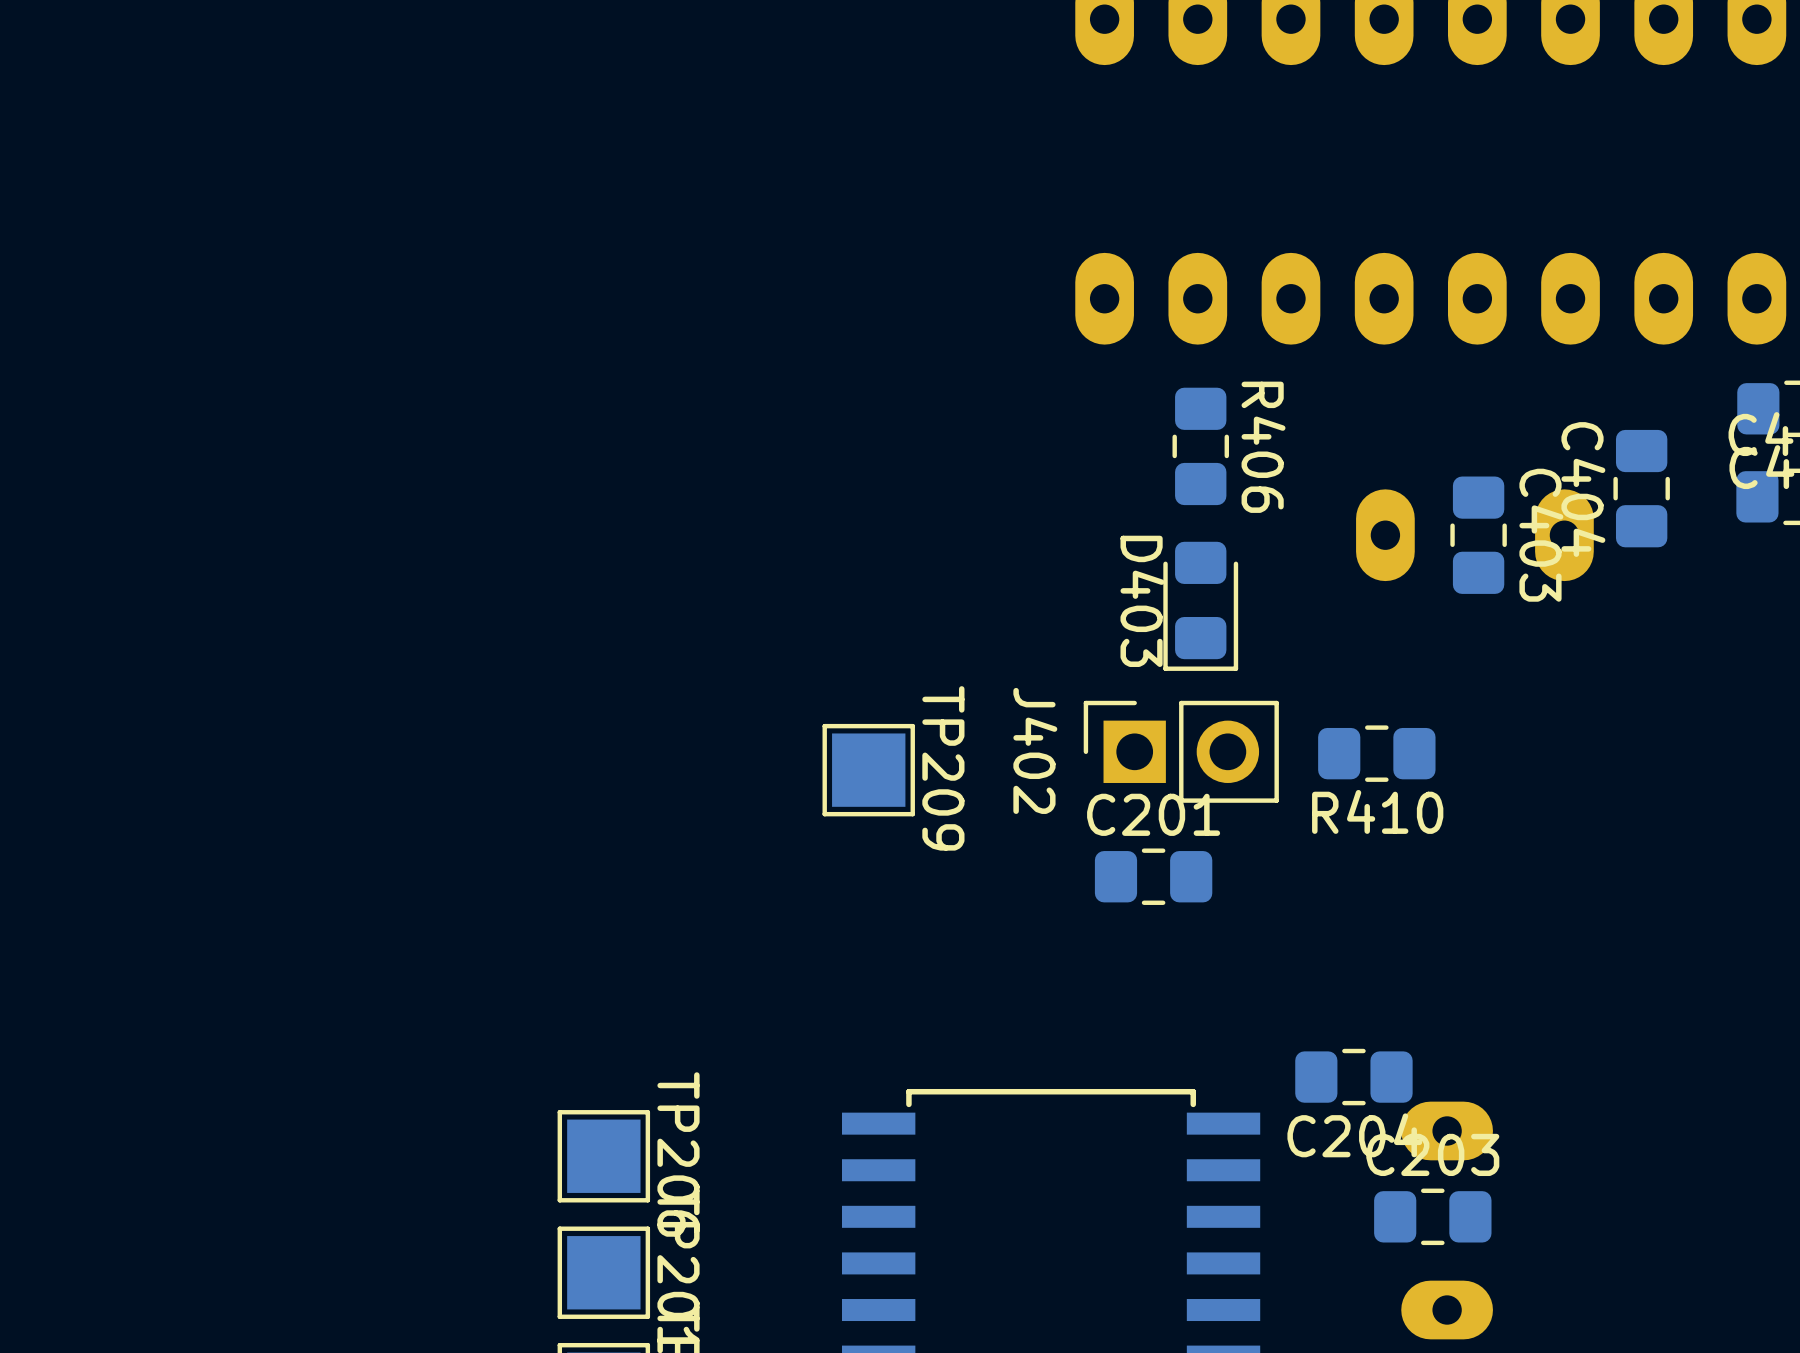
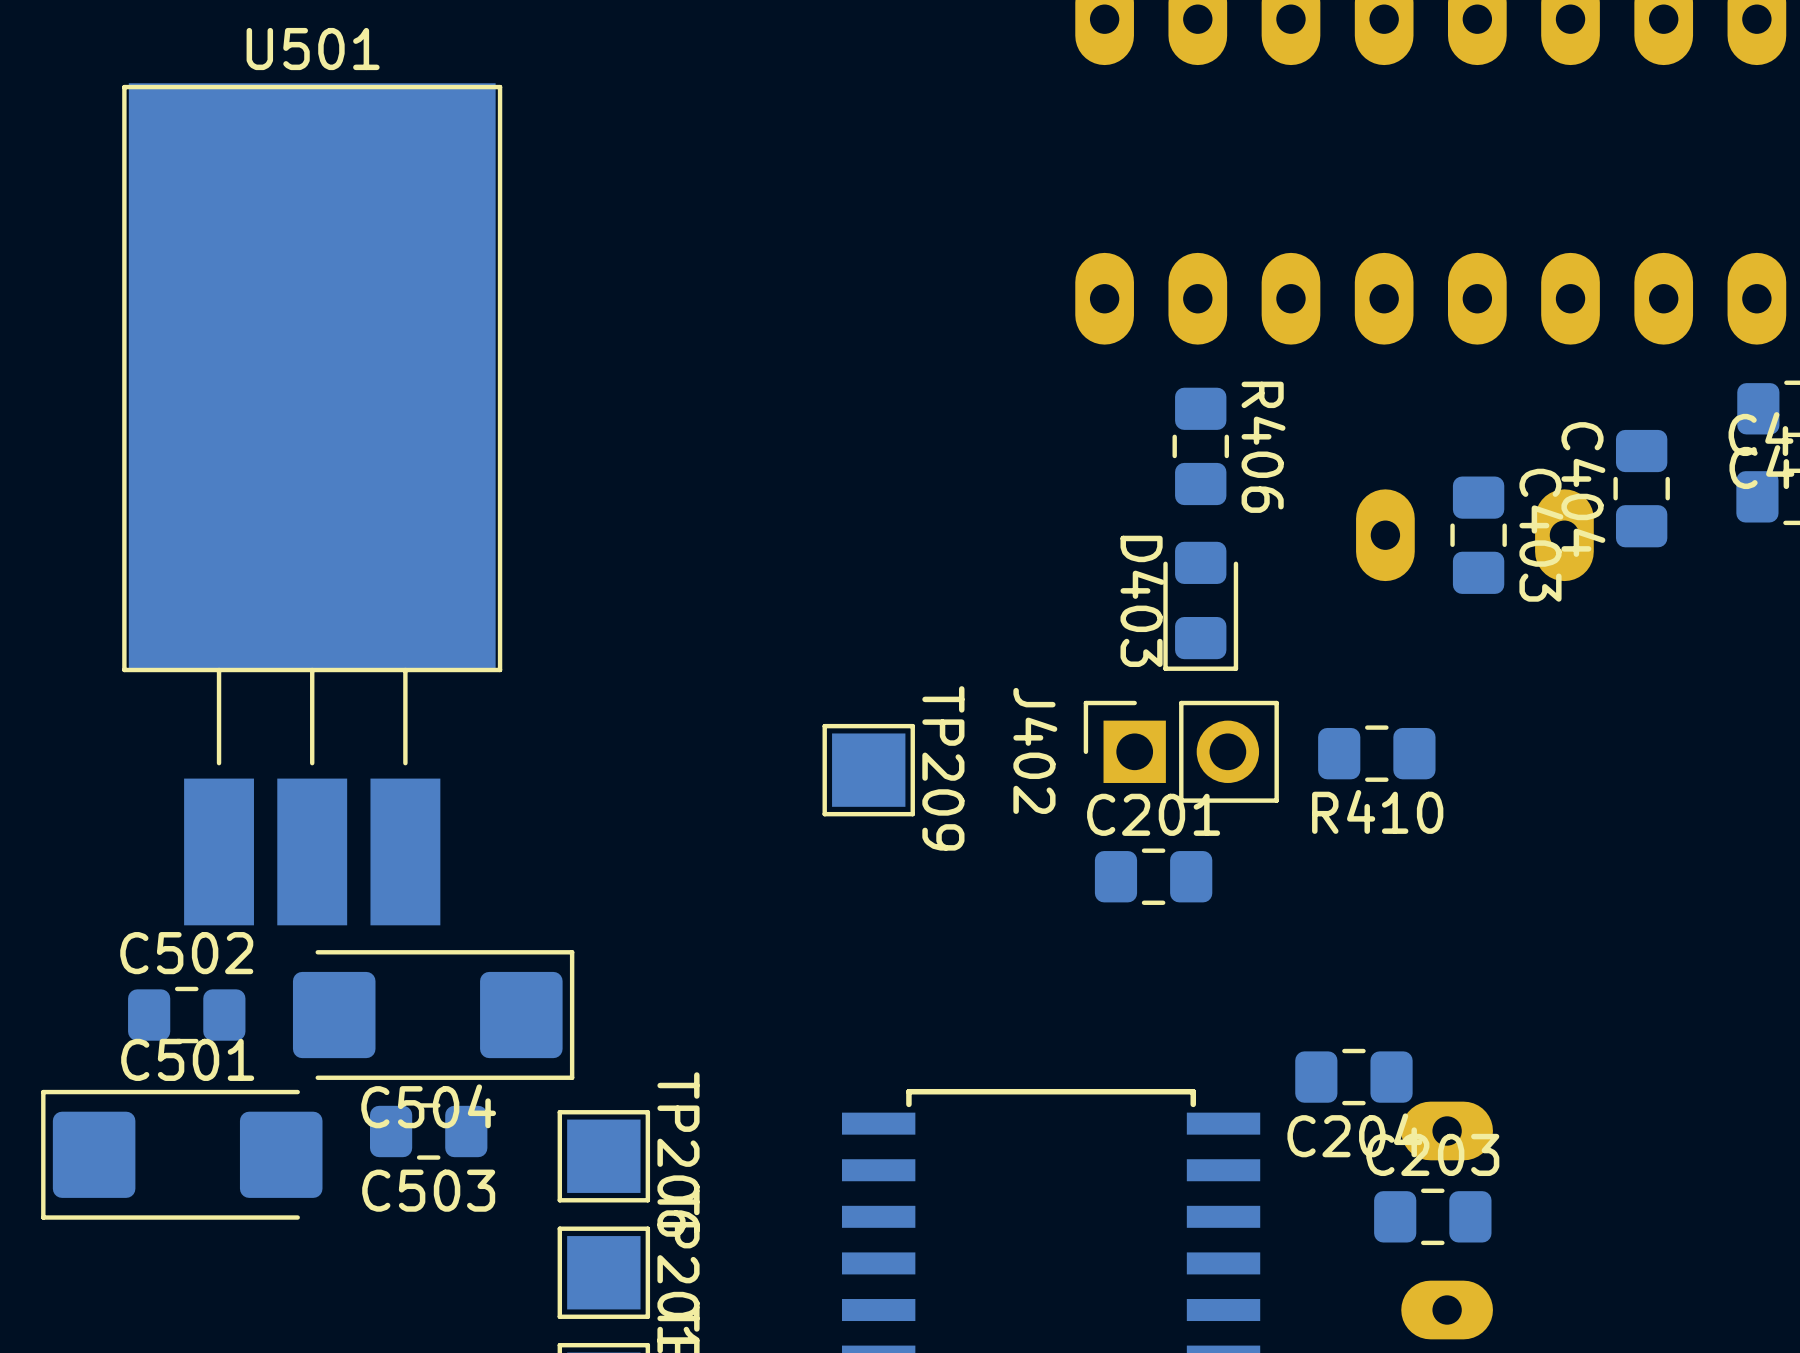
U501: none -> (312, 504)
C502: none -> (186, 1015)
C504: none -> (433, 1015)
C503: none -> (428, 1131)
C501: none -> (181, 1154)

